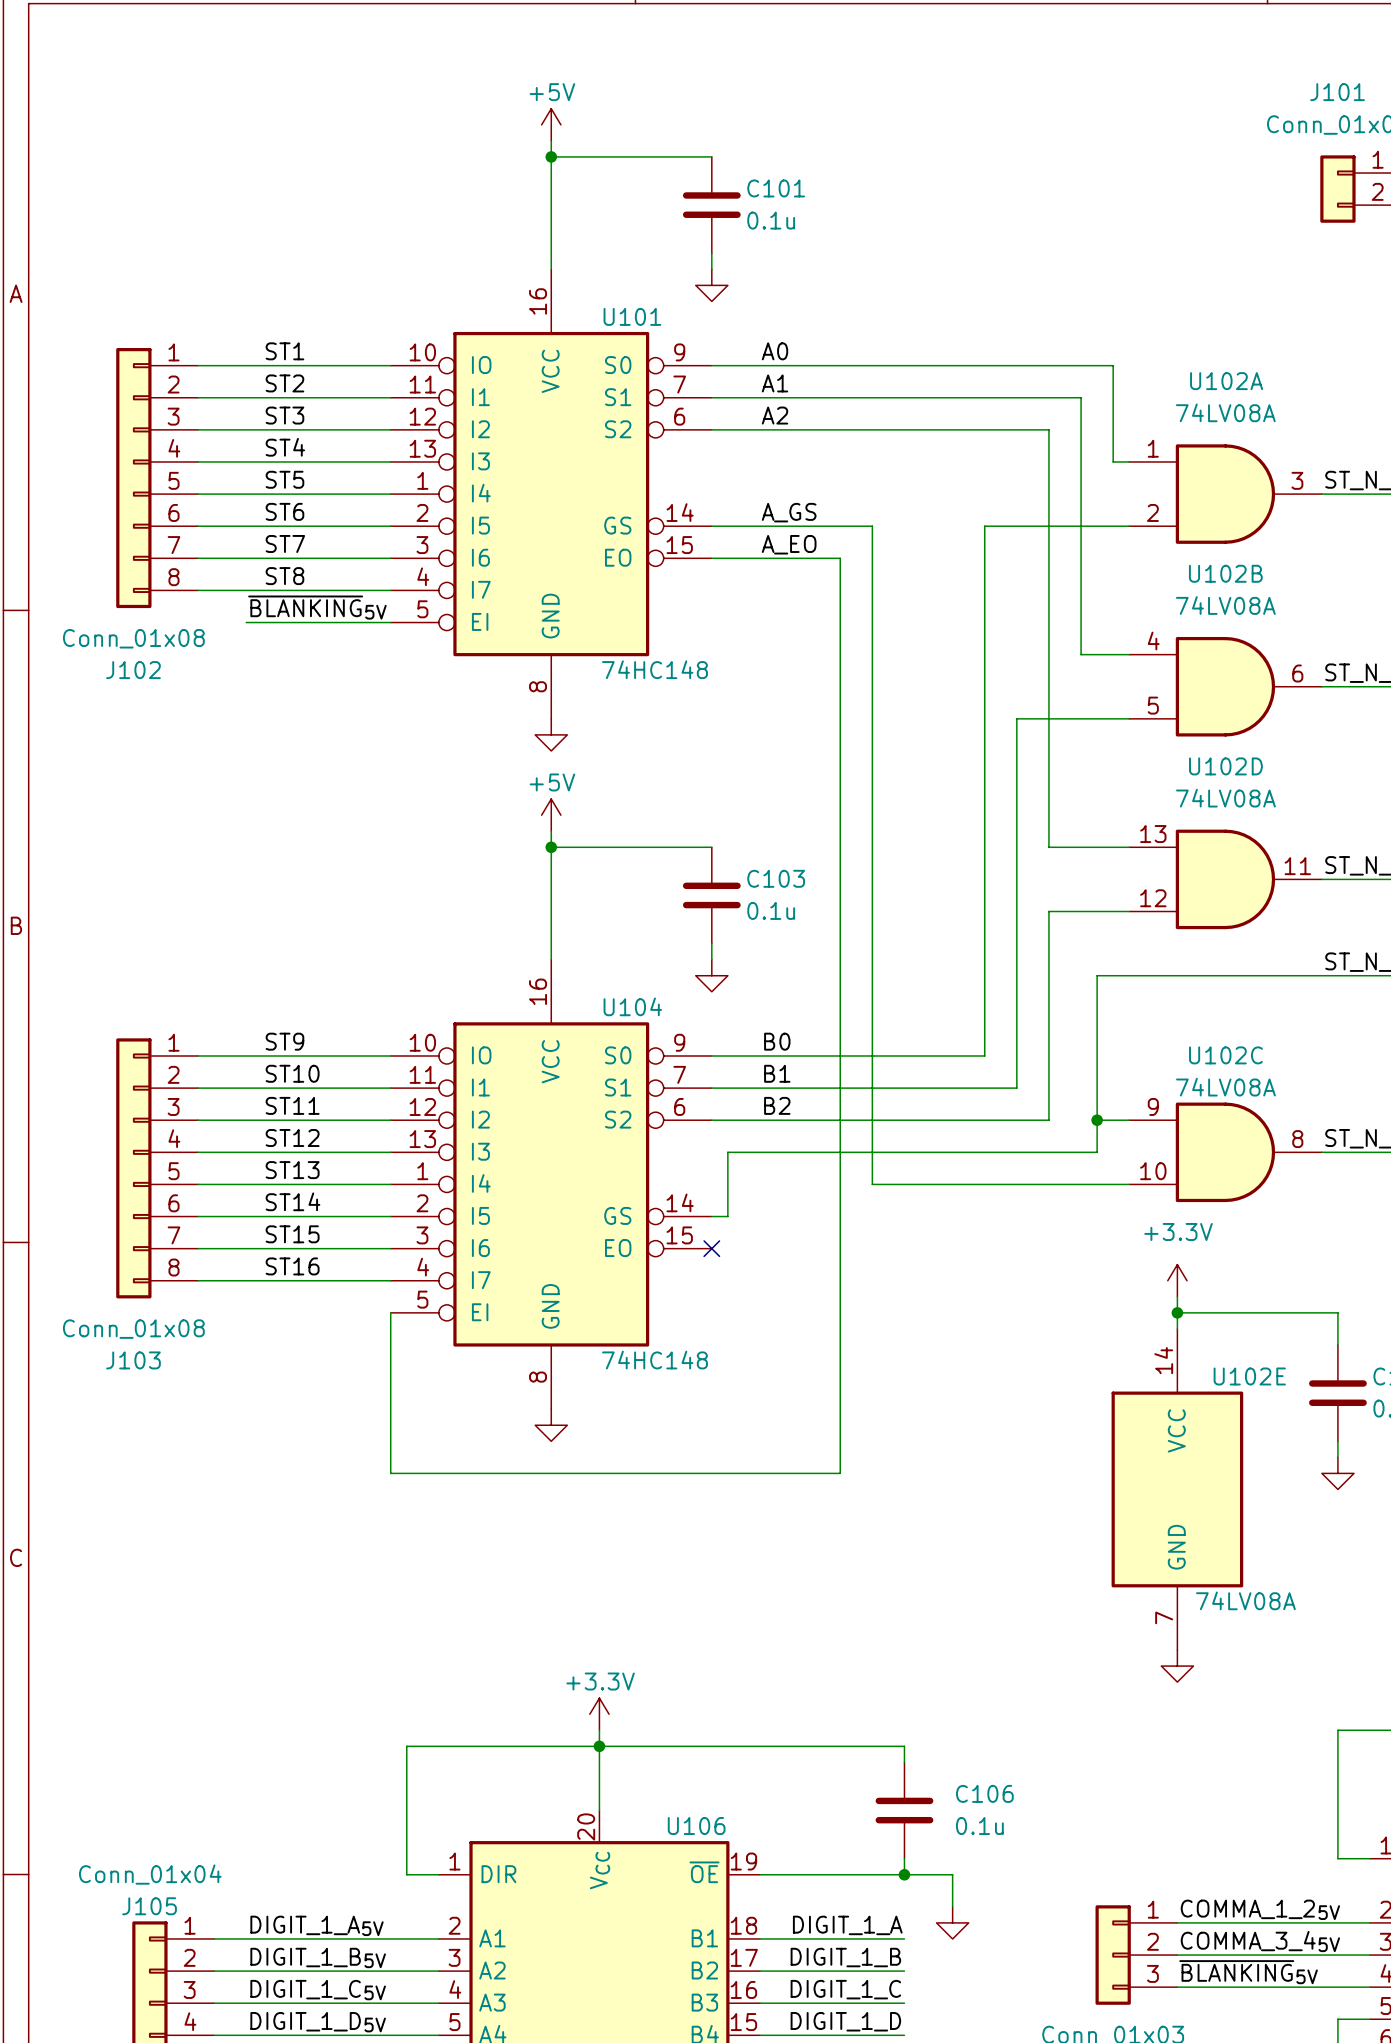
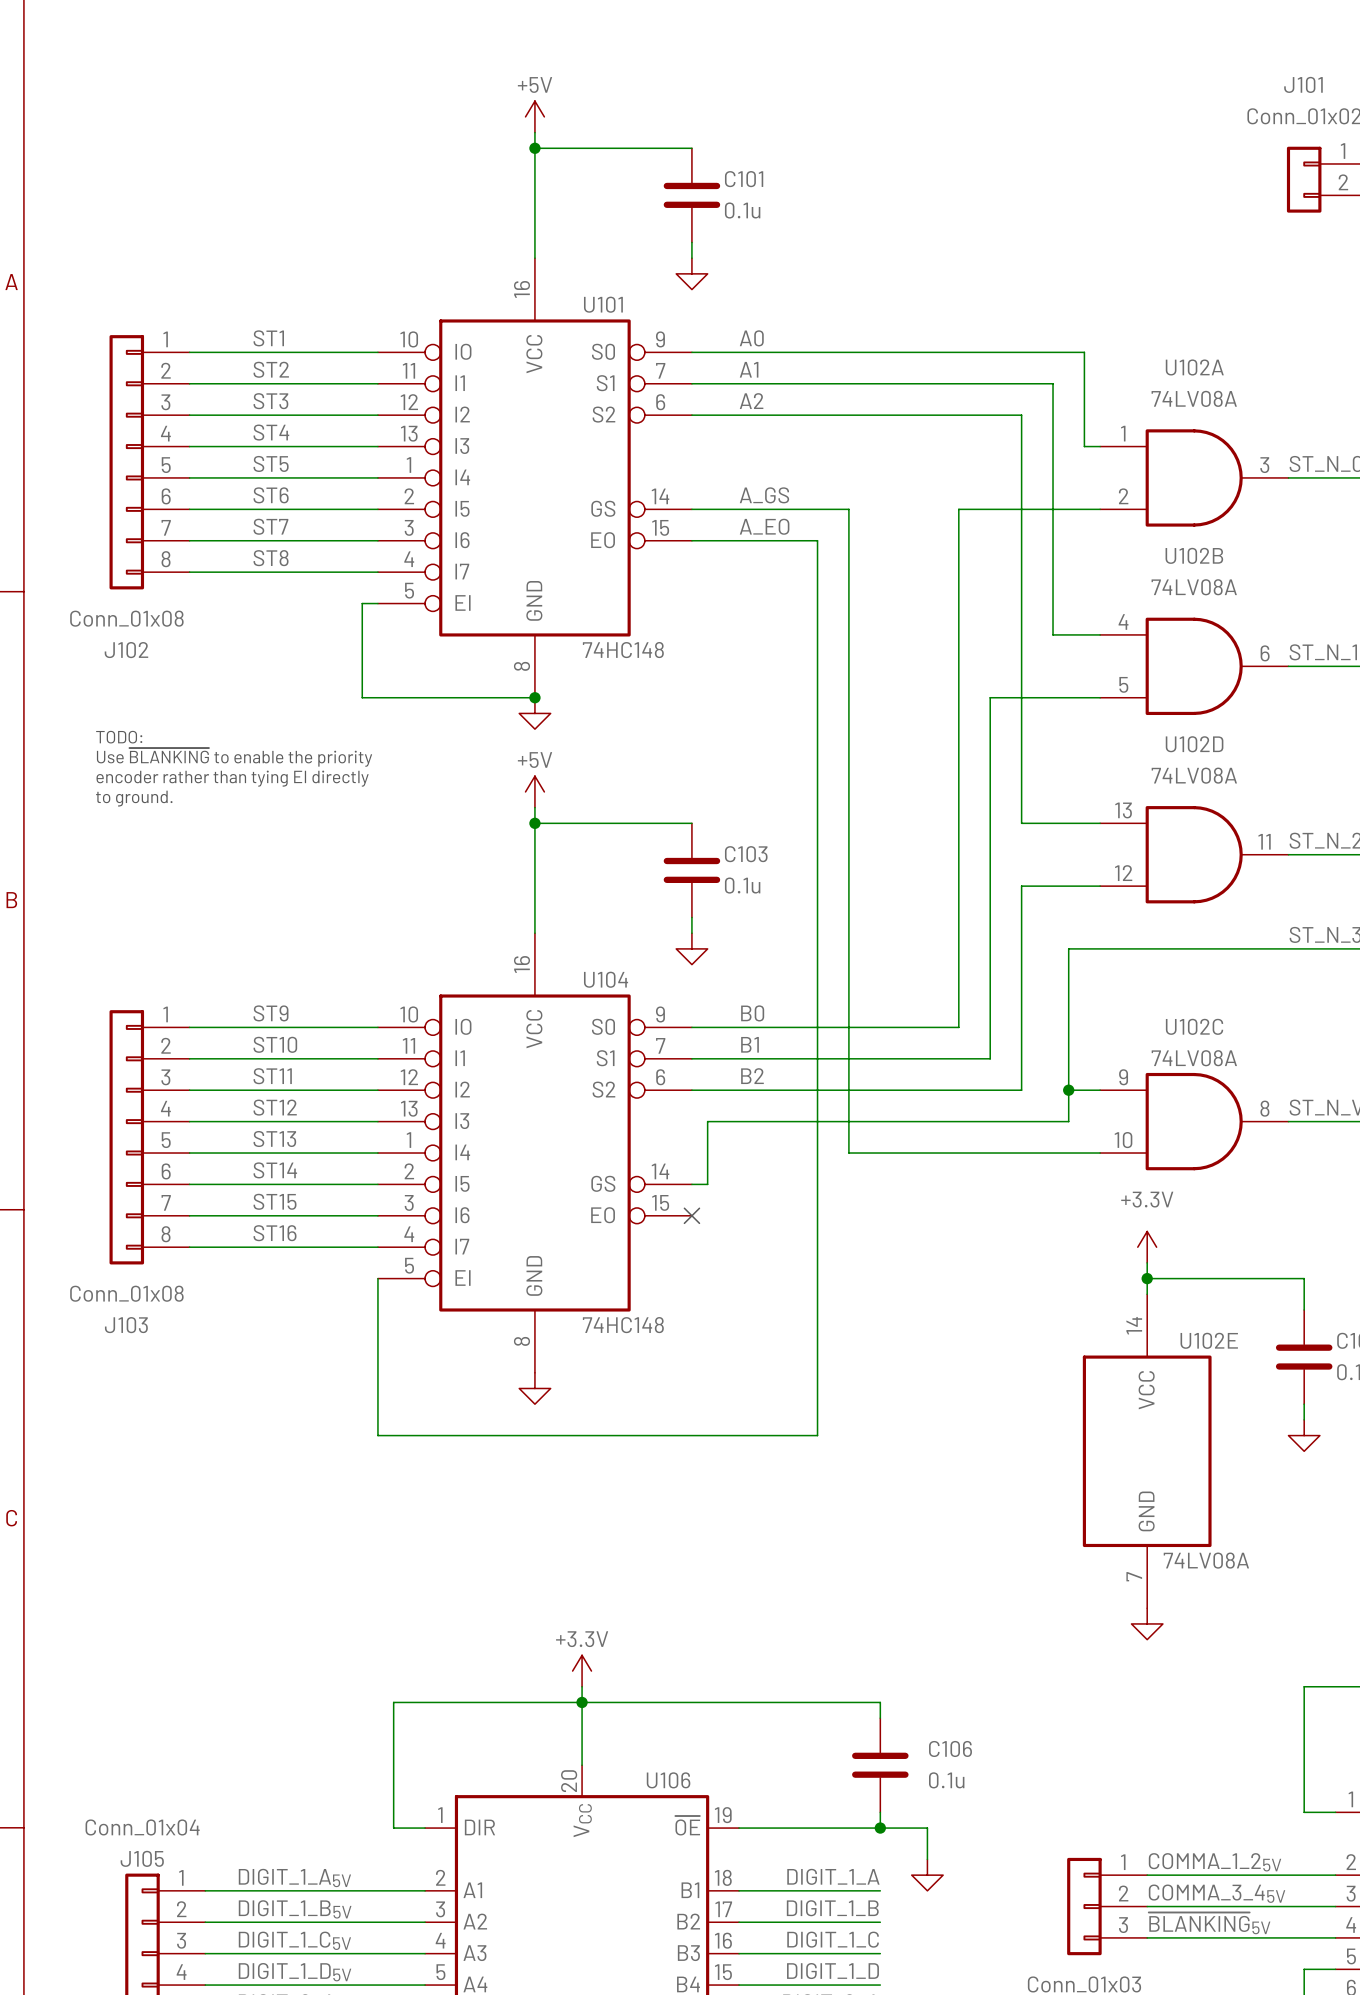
label: ~{BLANKING}5V (317, 607) -> none
wire: (246, 622) (374, 622) -> (534, 697) (362, 697) (362, 603)
junction: none -> (534, 697)
text: none -> TODO: (119, 737)
text: none -> Use ~{BLANKING} to enable the priority (234, 757)
text: none -> encoder rather than tying EI directly (232, 778)
text: none -> to ground. (134, 798)

